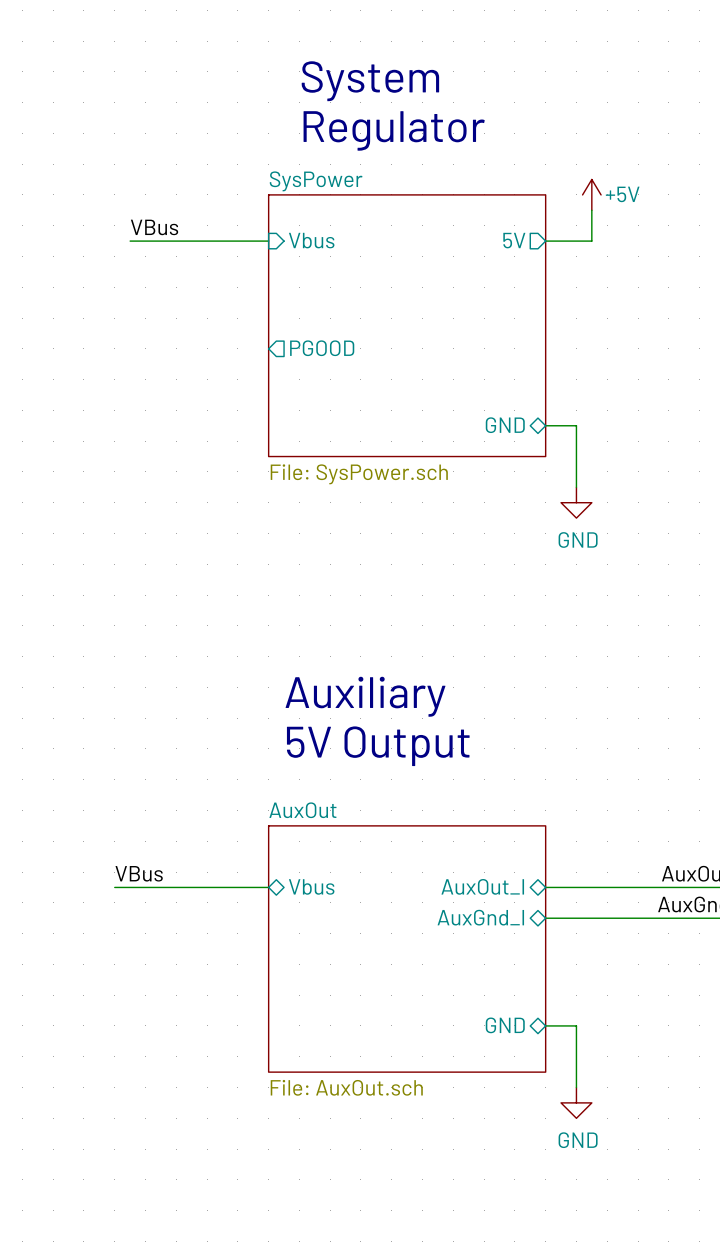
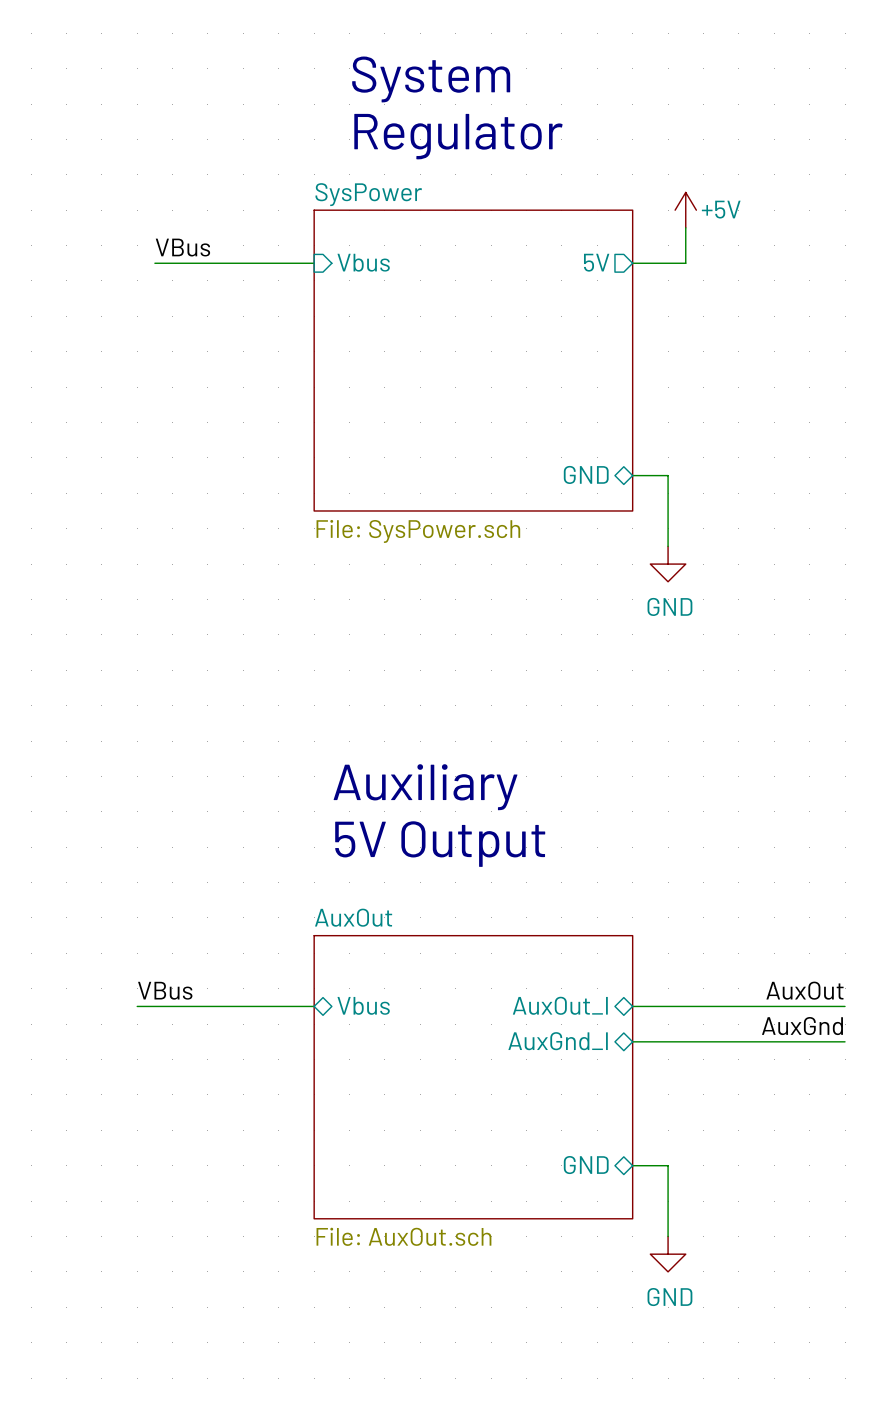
sheet pin: PGOOD (322, 348) -> none

